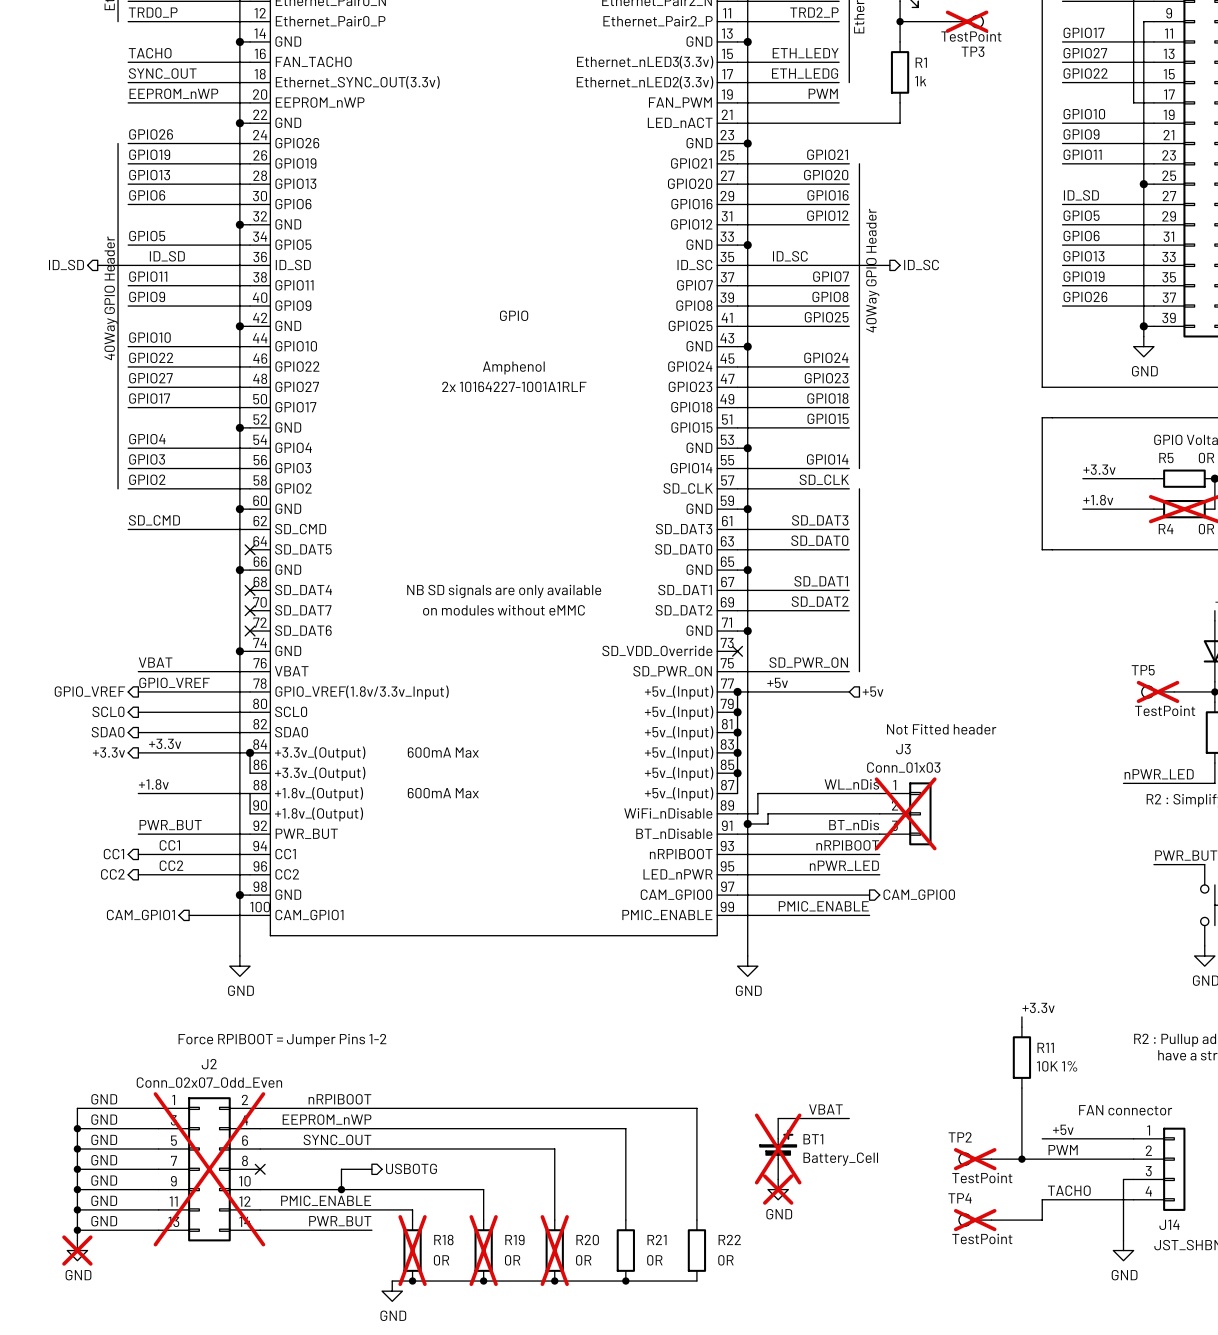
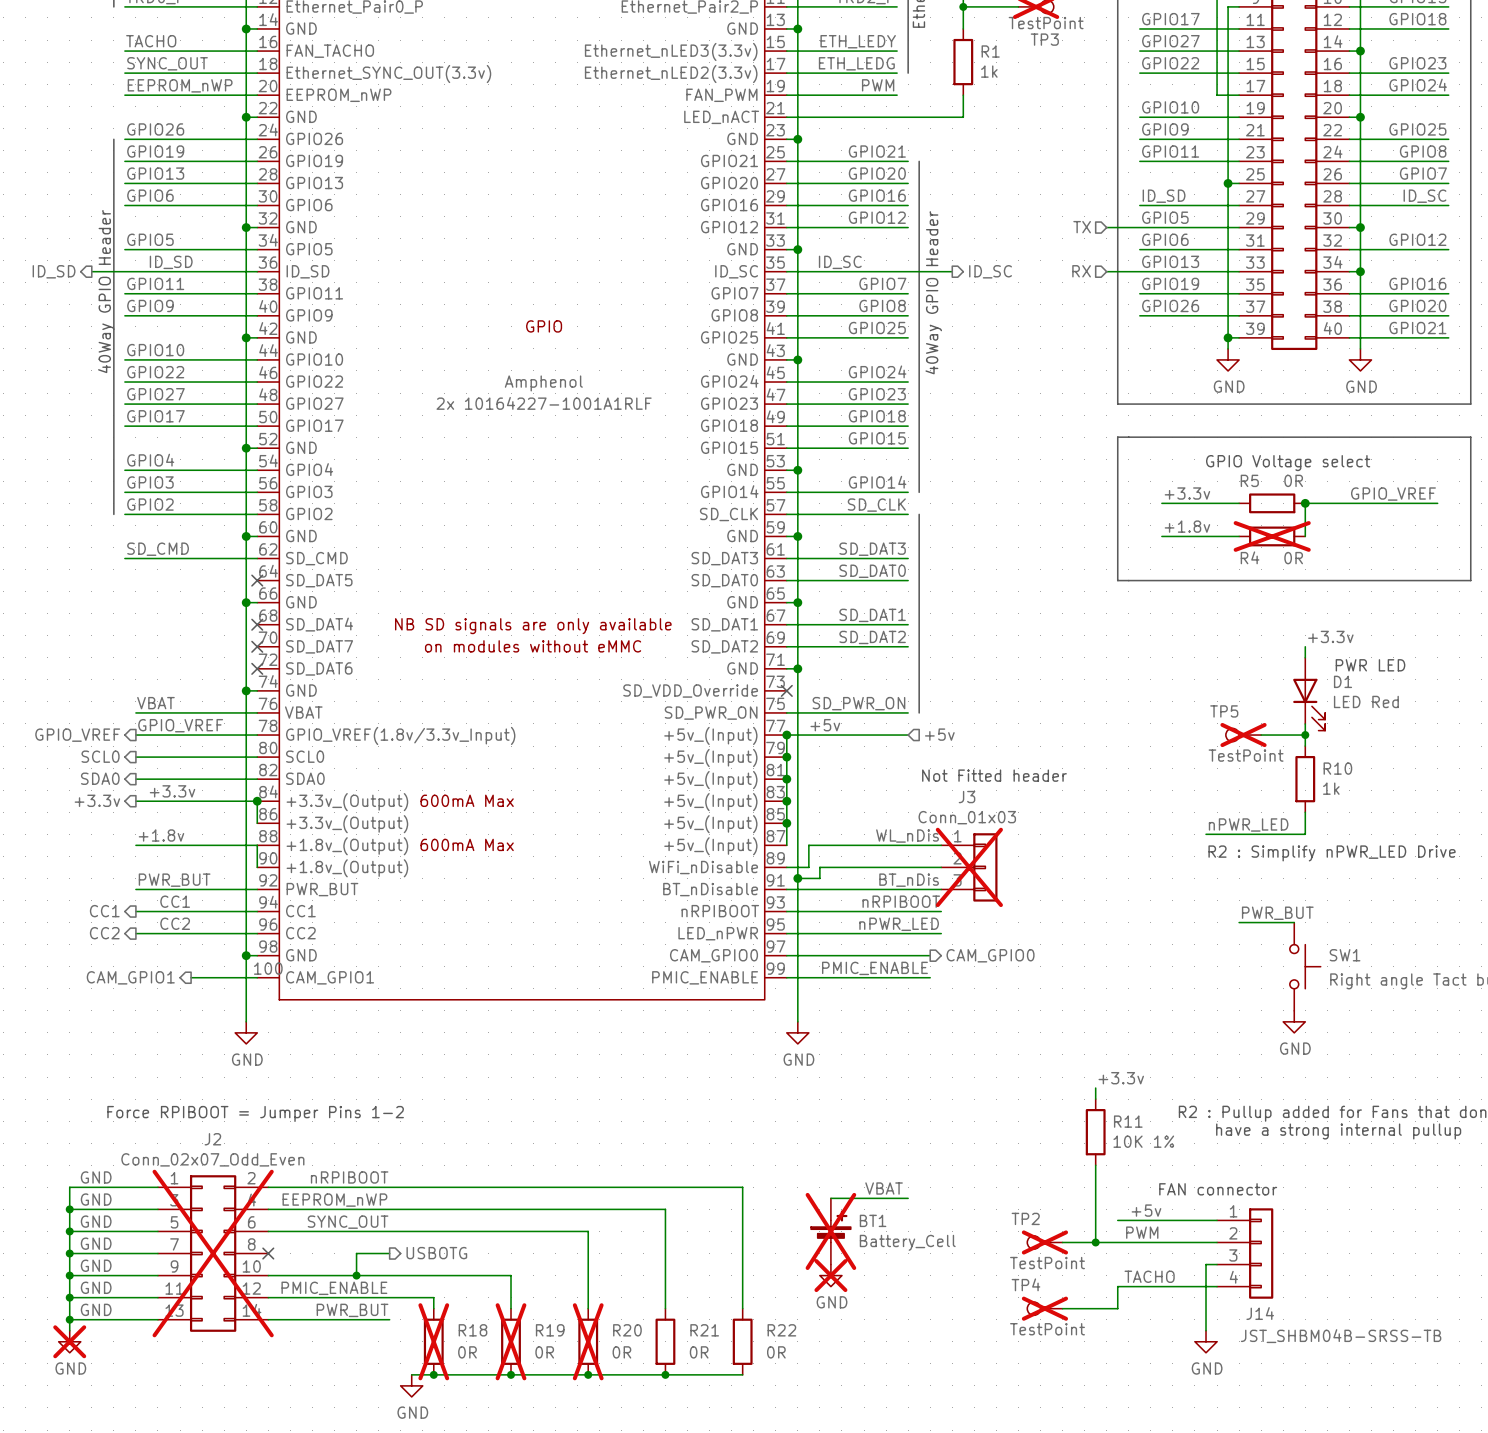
hierarchical label: none -> TX (1082, 227)
wire: none -> (1106, 227) (1139, 227)
hierarchical label: none -> RX (1081, 271)
wire: none -> (1106, 271) (1139, 271)

